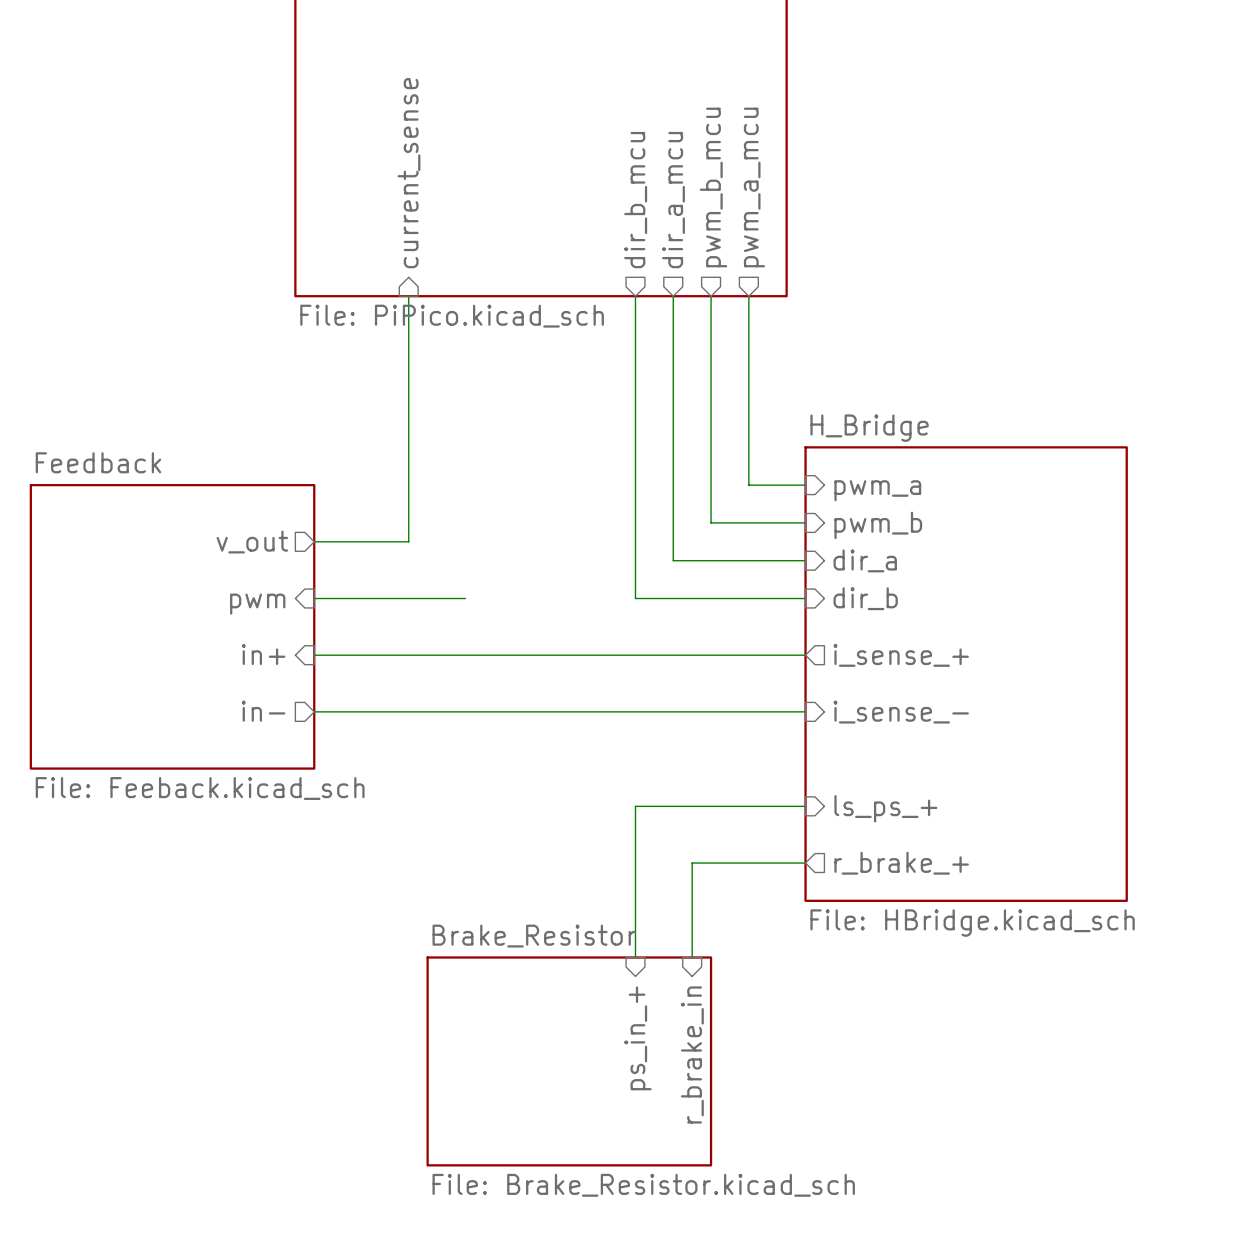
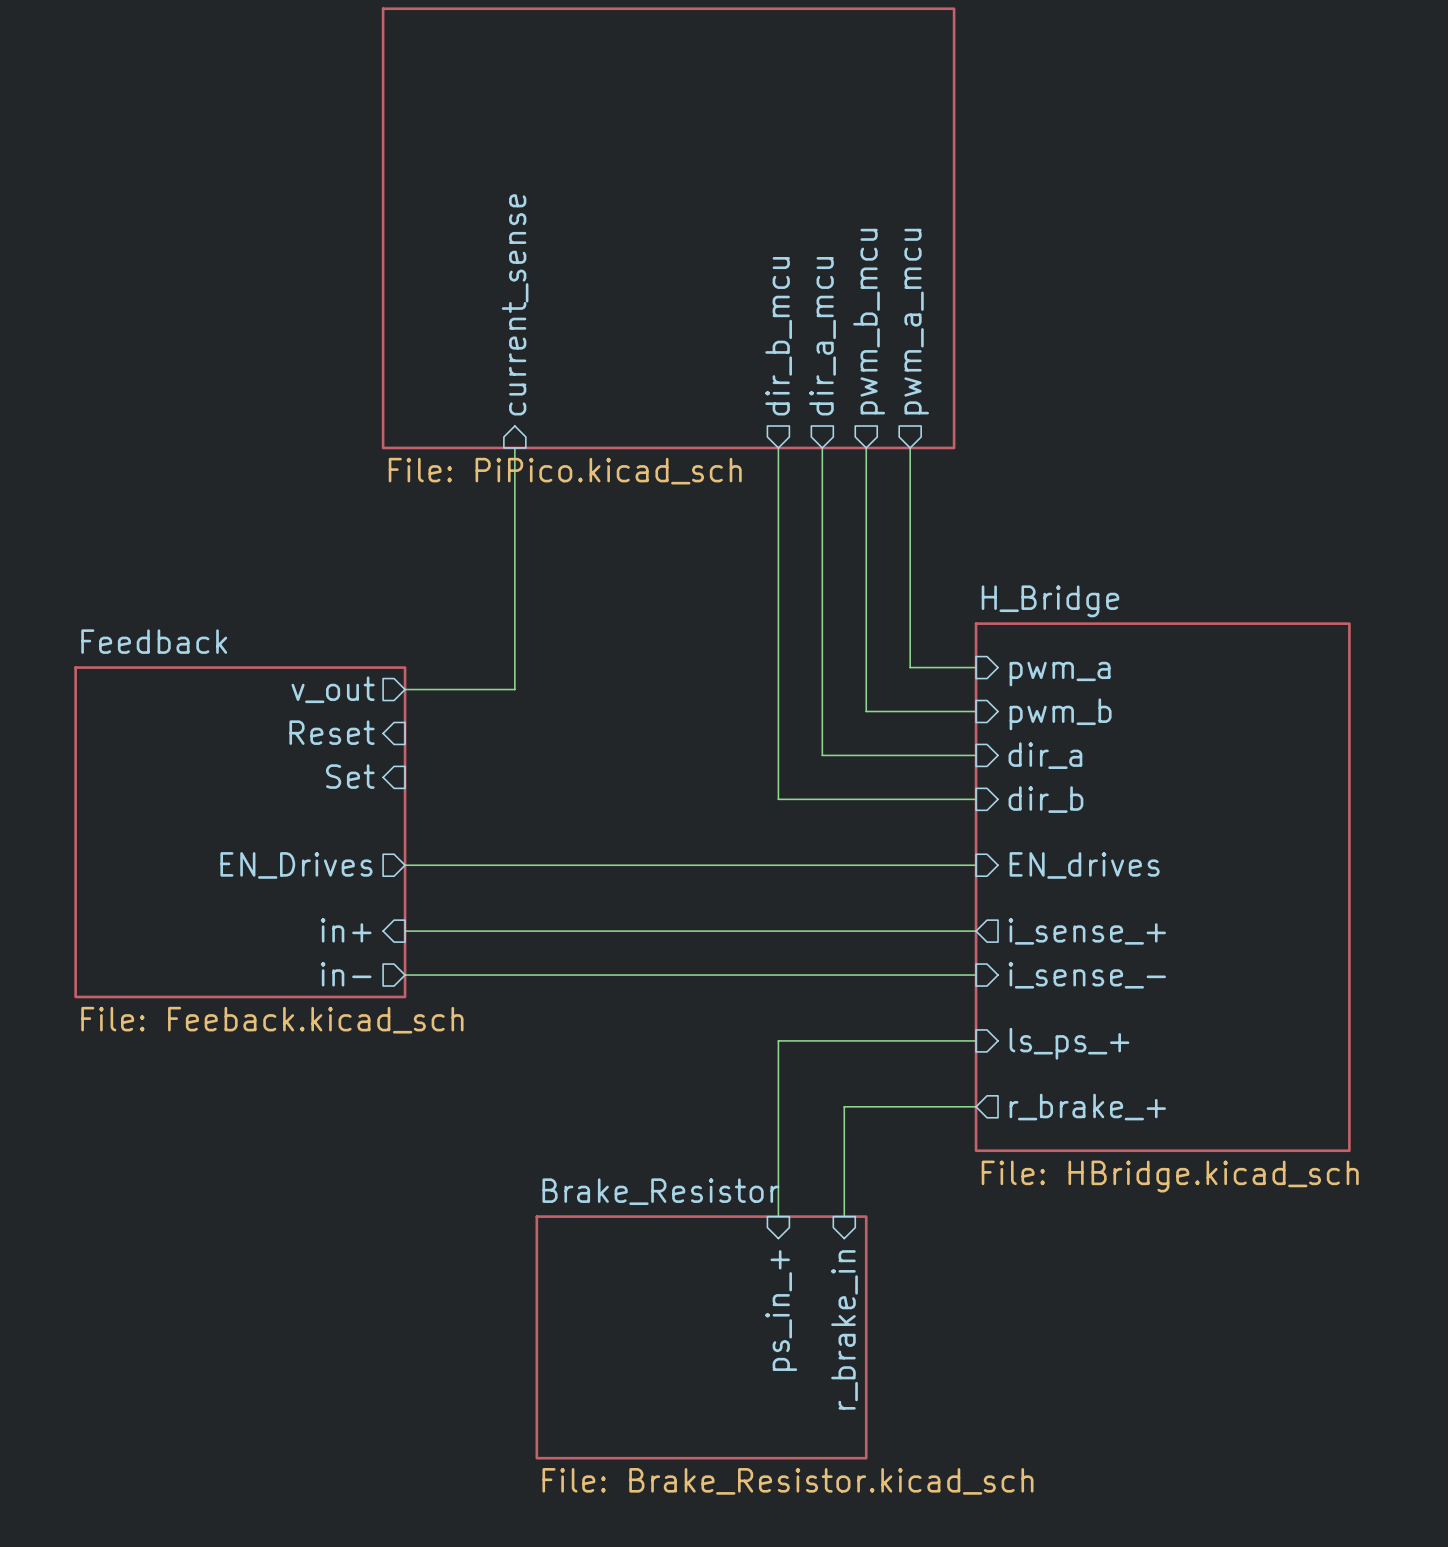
sheet pin: none -> v_out (333, 689)
wire: (408, 504) (408, 541) (314, 541) -> (514, 689) (405, 689)
sheet pin shape: output (252, 542) -> input (332, 732)
sheet pin: v_out (252, 542) -> Reset (332, 732)
sheet pin: none -> Set (350, 776)
wire: (314, 598) (465, 598) -> none
sheet pin: pwm (257, 604) -> none
sheet pin shape: input (263, 654) -> output (296, 865)
sheet pin: in+ (263, 654) -> EN_Drives (296, 865)
sheet pin shape: output (901, 655) -> input (1084, 865)
sheet pin: i_sense_+ (901, 655) -> EN_drives (1084, 865)
sheet pin shape: output (263, 711) -> input (346, 930)
sheet pin: in- (263, 711) -> in+ (346, 930)
sheet pin shape: input (901, 712) -> output (1087, 931)
sheet pin: i_sense_- (901, 712) -> i_sense_+ (1087, 931)
sheet pin: none -> in- (346, 974)
wire: none -> (405, 975) (976, 975)
sheet pin: none -> i_sense_- (1087, 975)

